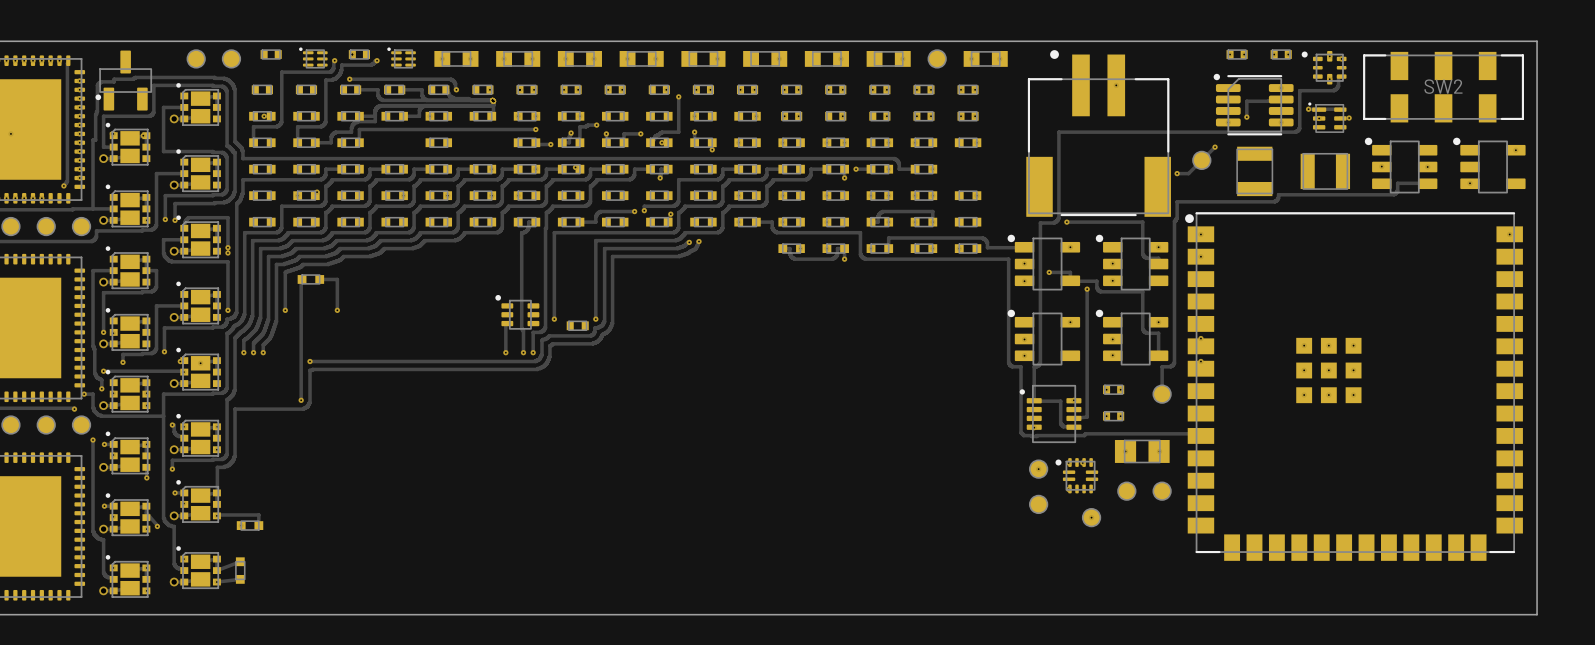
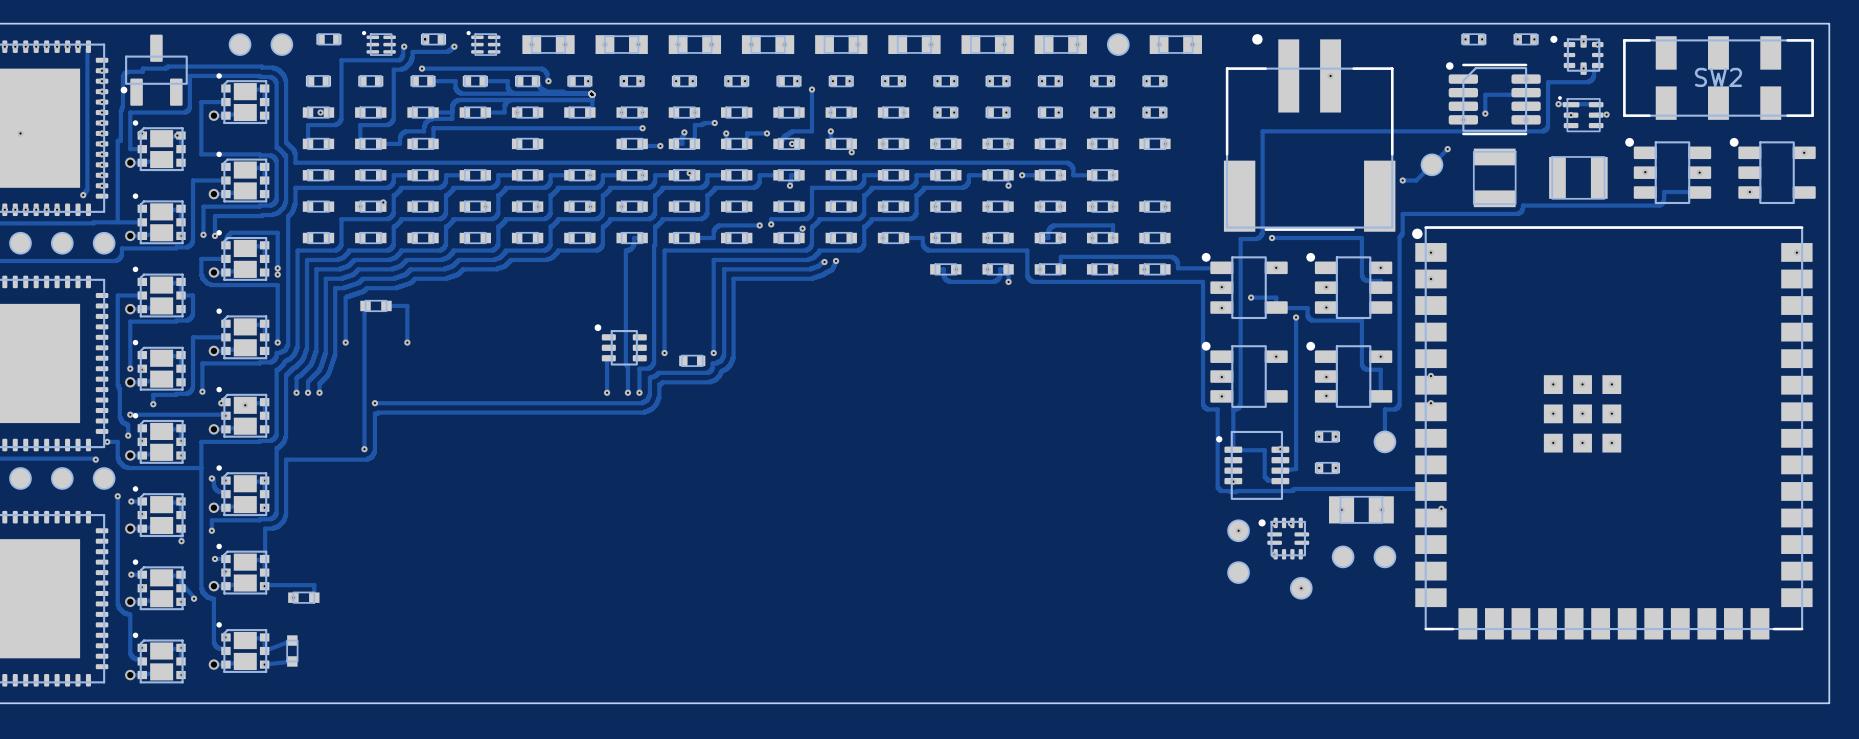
via: none -> (1441, 508)

